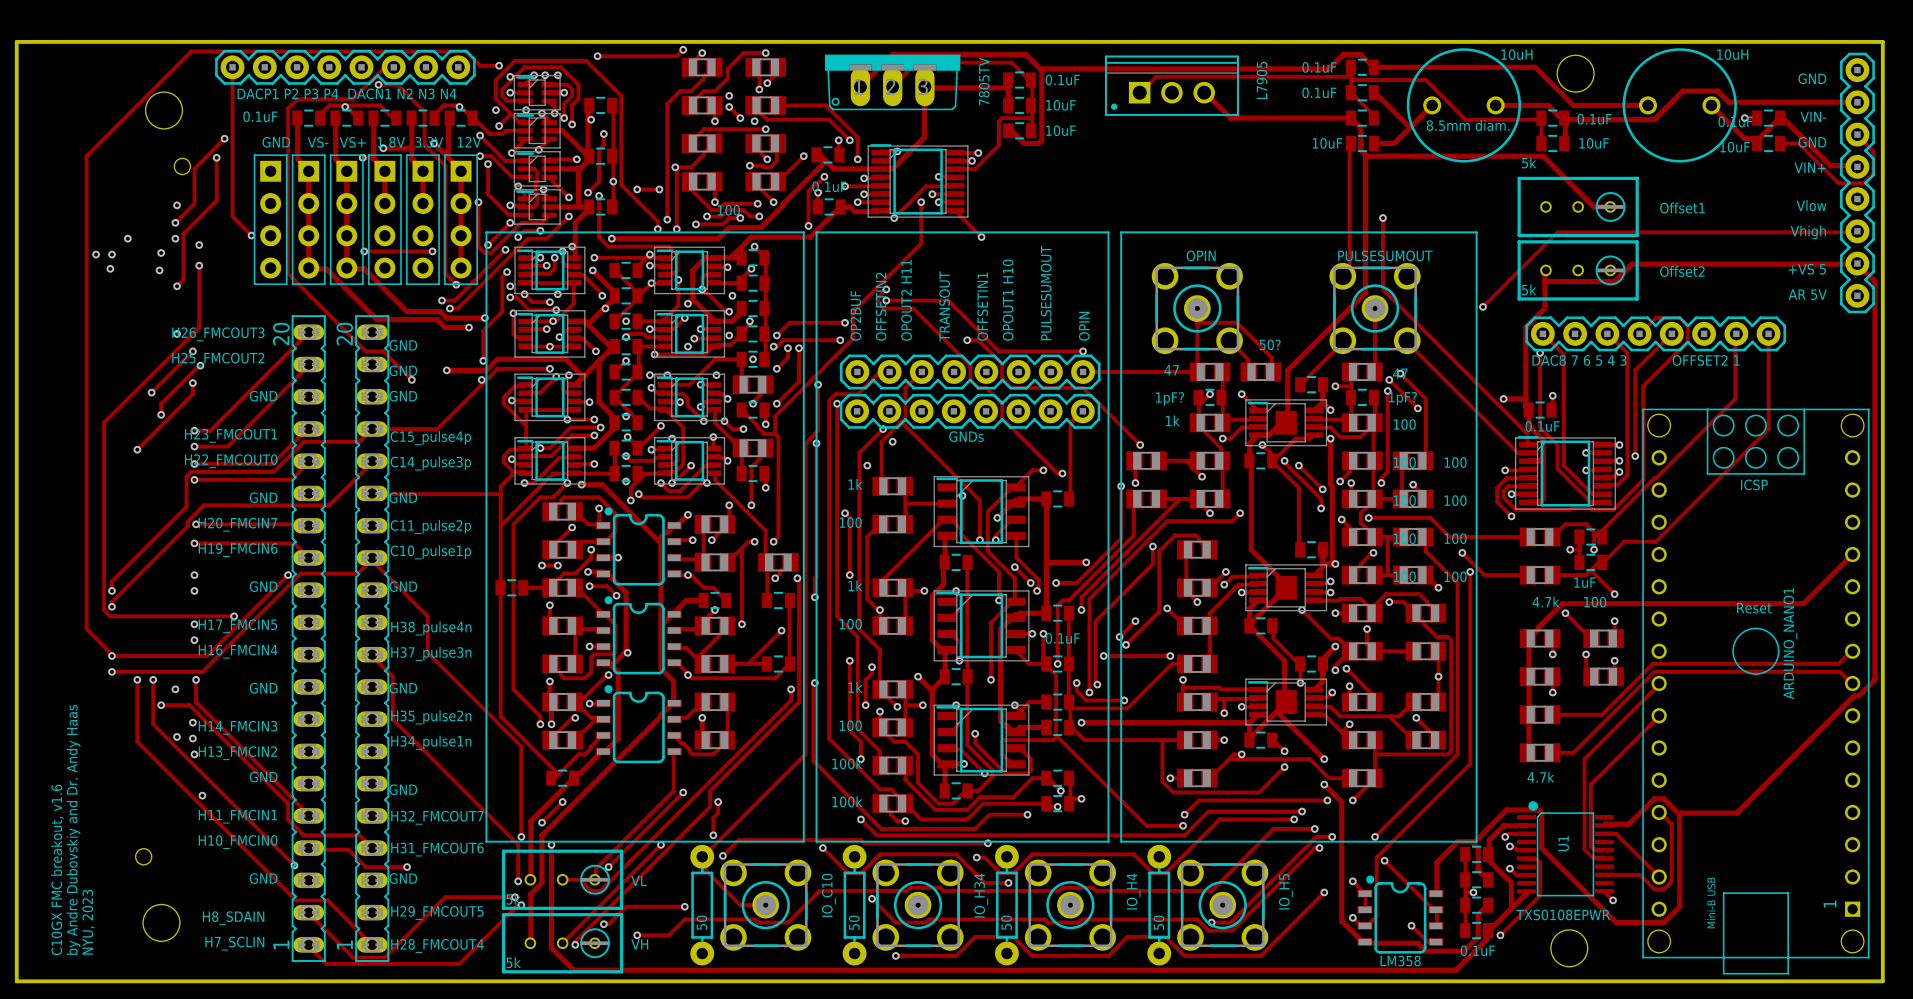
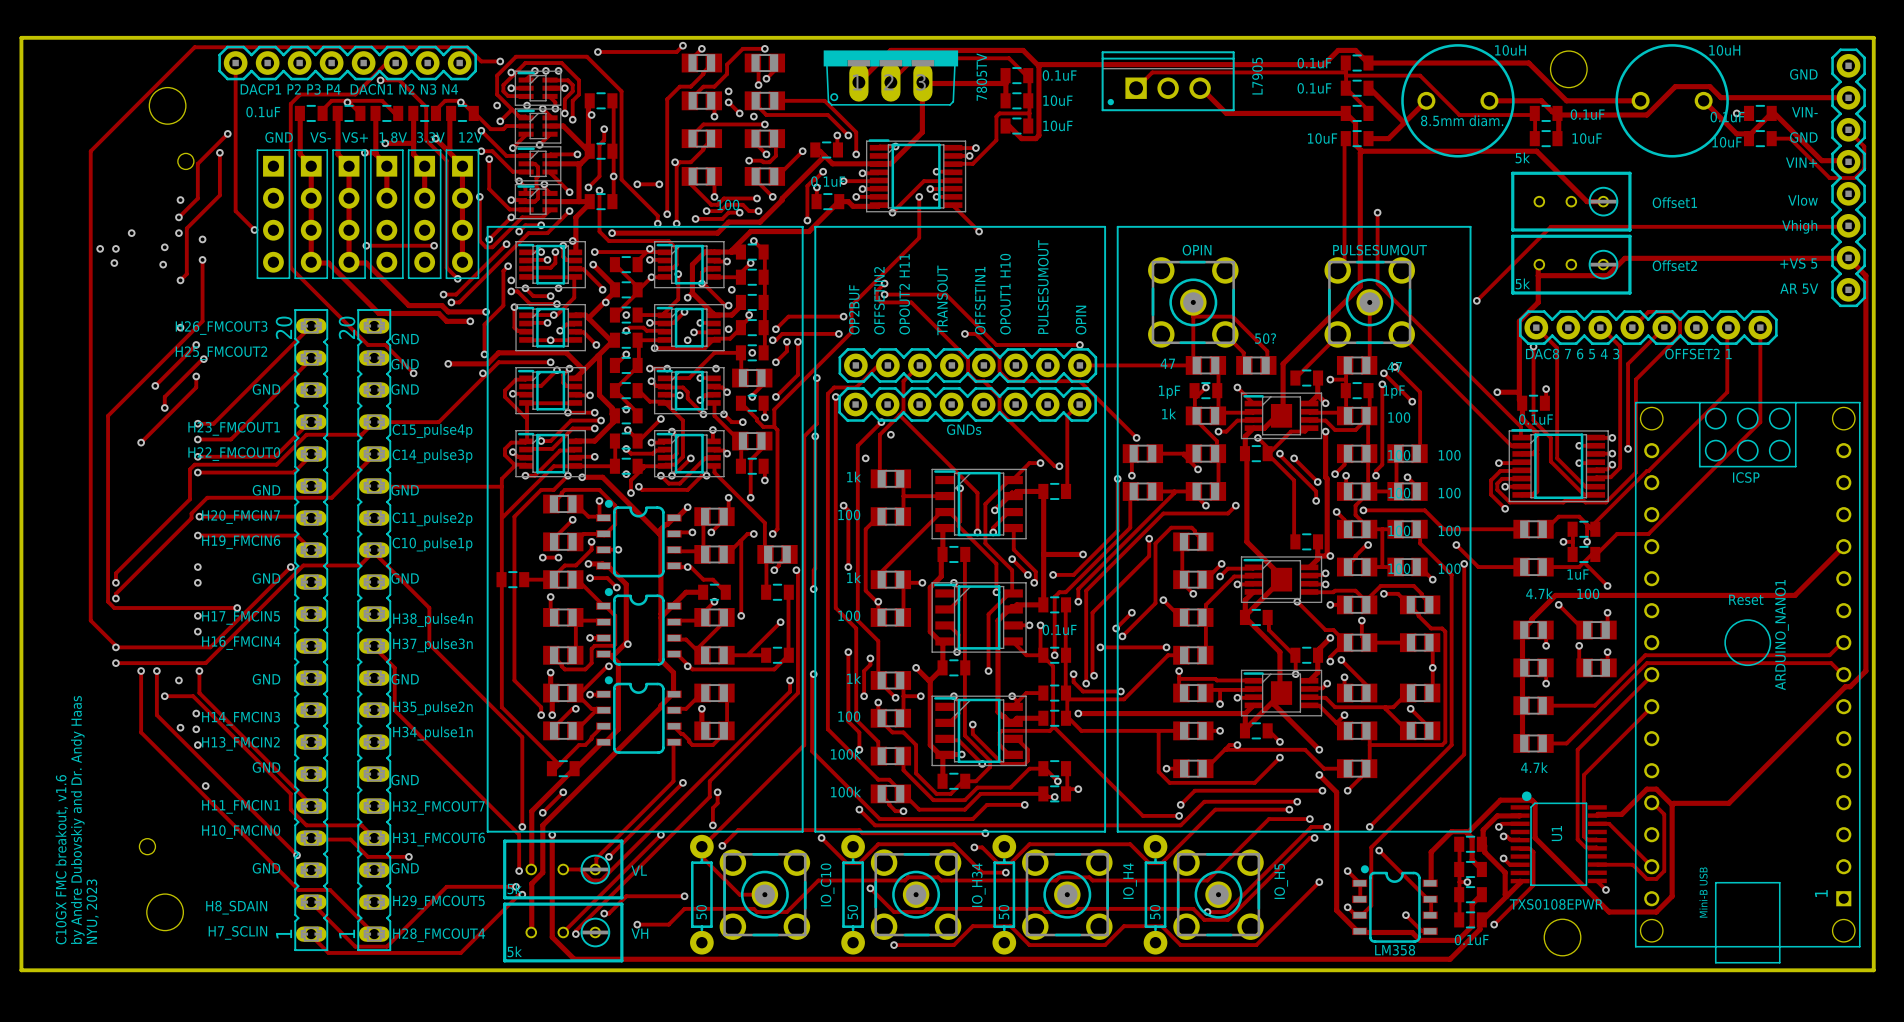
part value: 1pF? (1169, 398) -> 1pF (1169, 392)
part value: 1pF? (1402, 398) -> 1pF (1394, 391)

